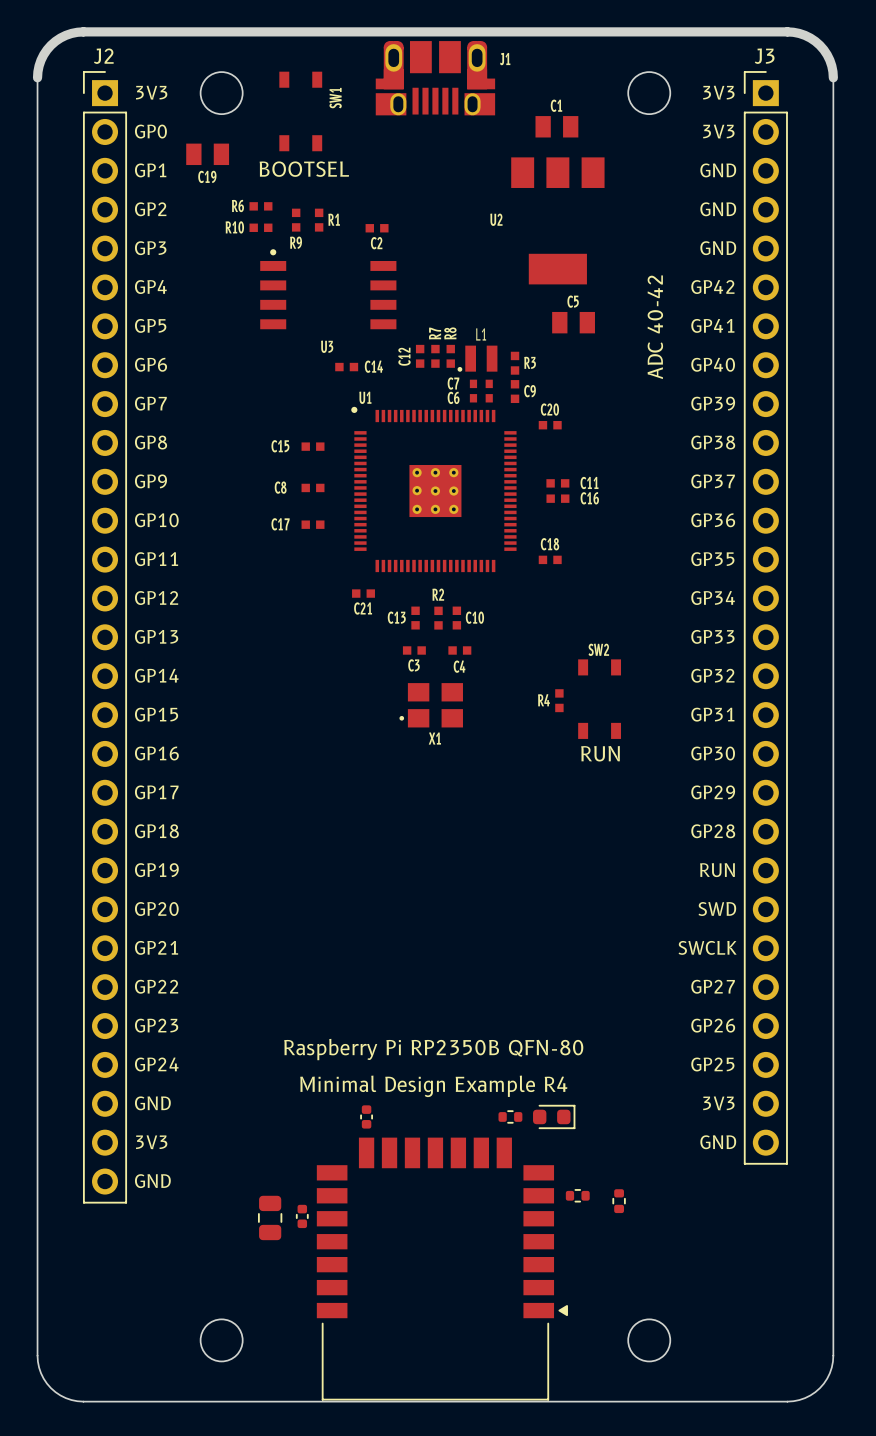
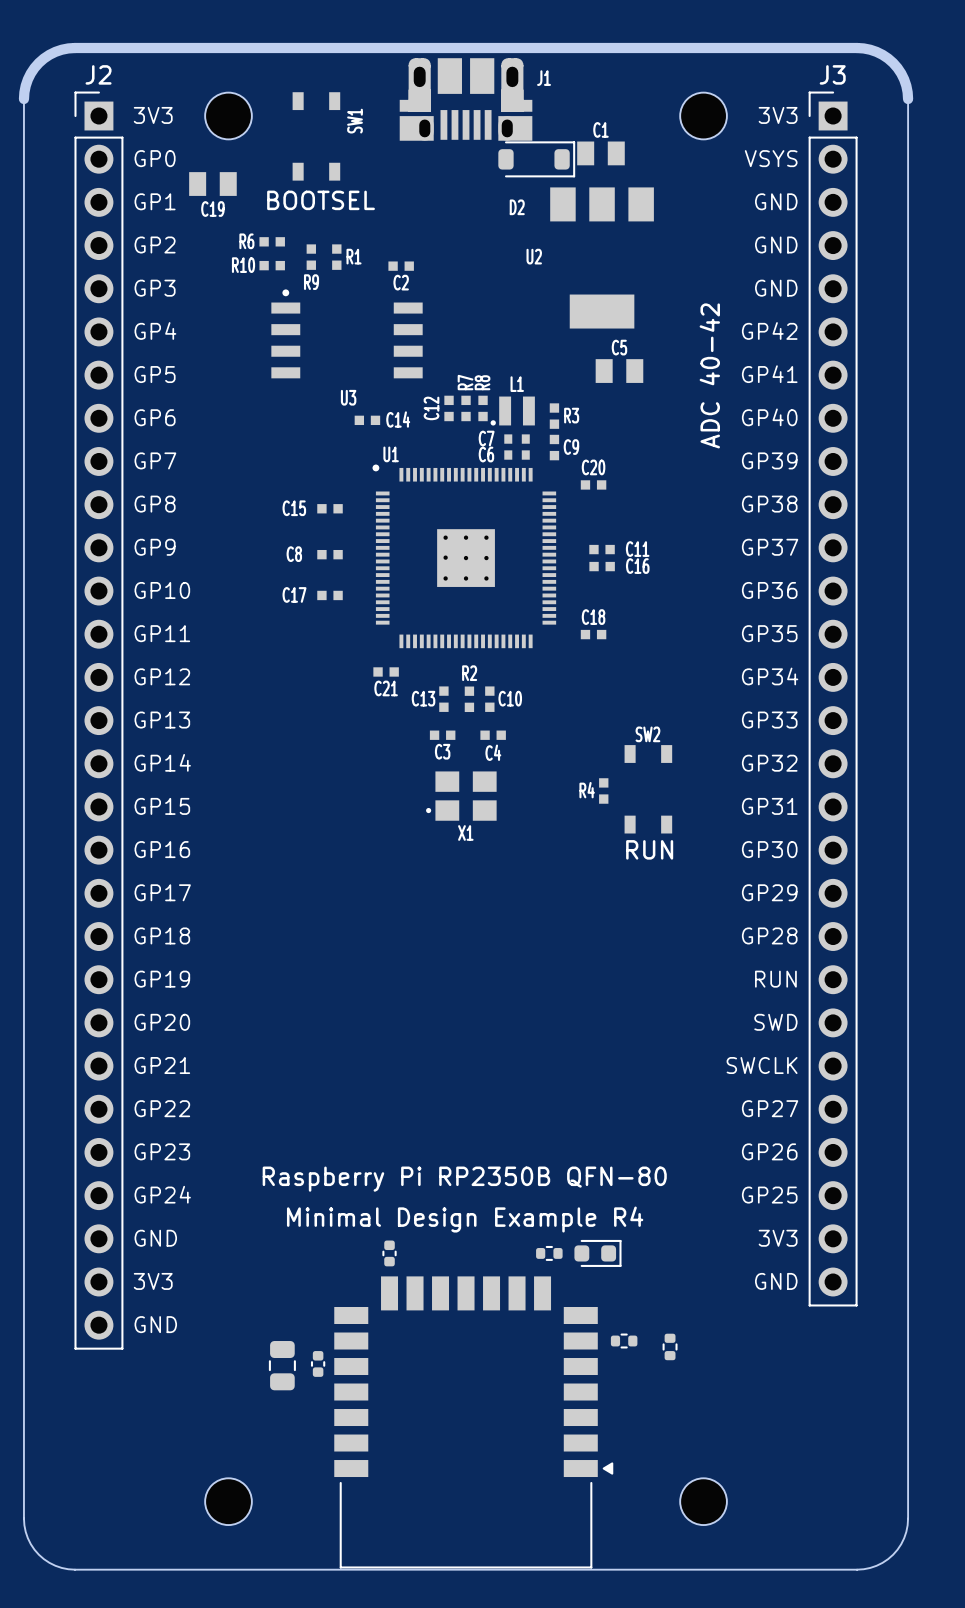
text: 3V3 (718, 131) -> VSYS (771, 158)
D2: none -> (536, 159)

